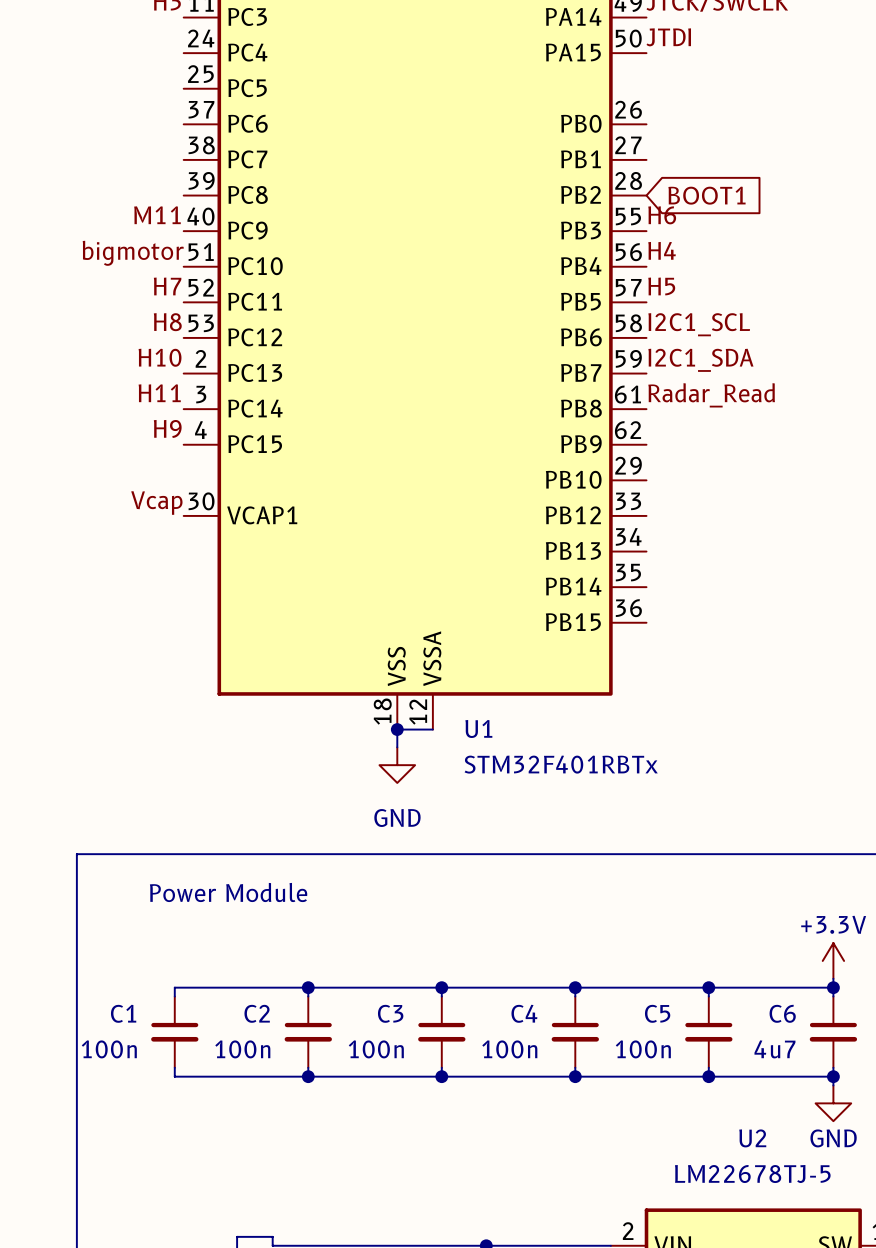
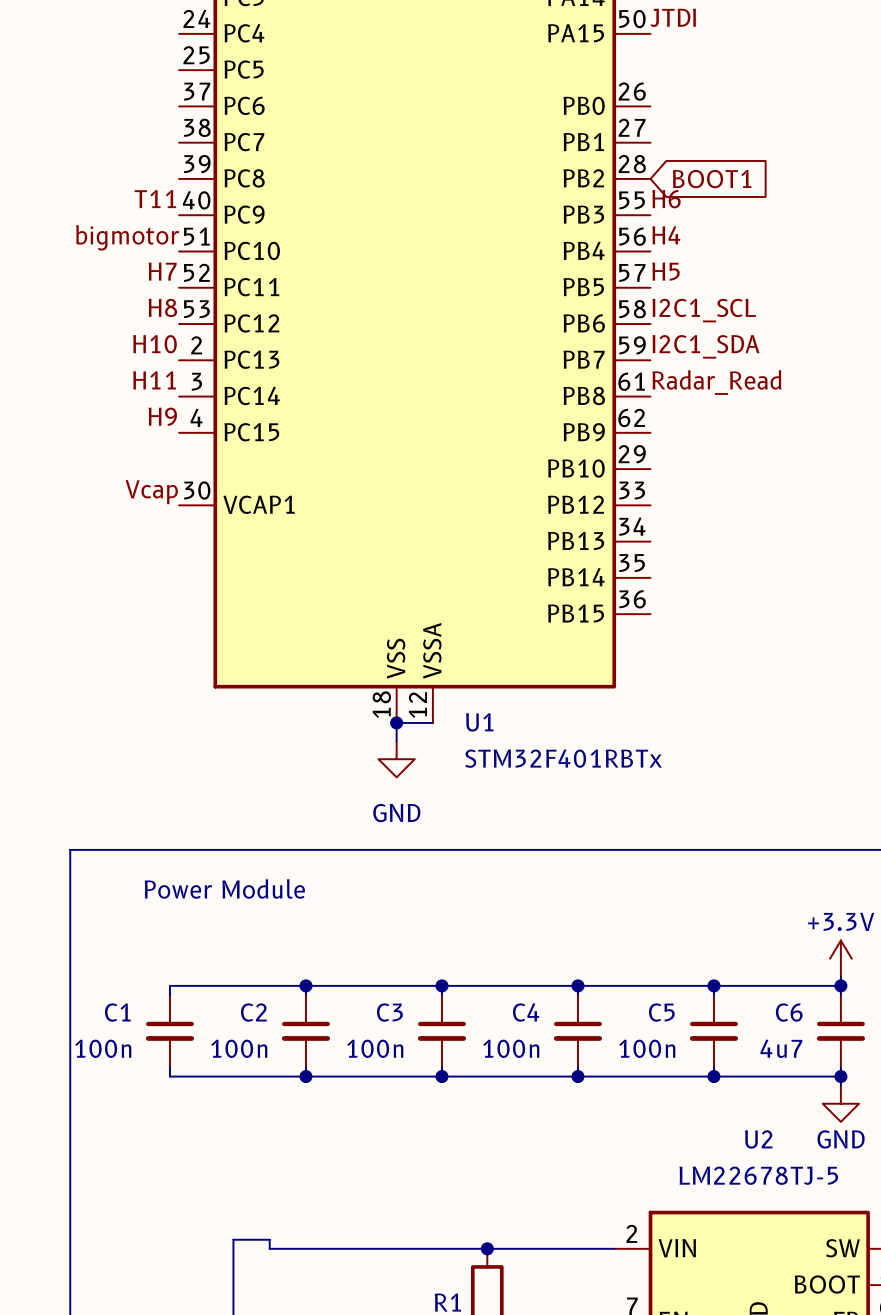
label: M11 (157, 215) -> T11 (155, 199)

